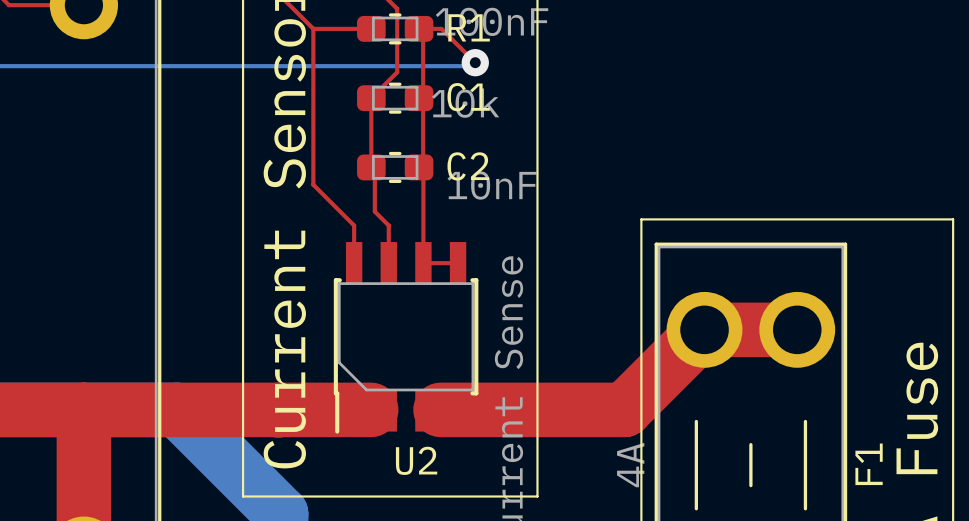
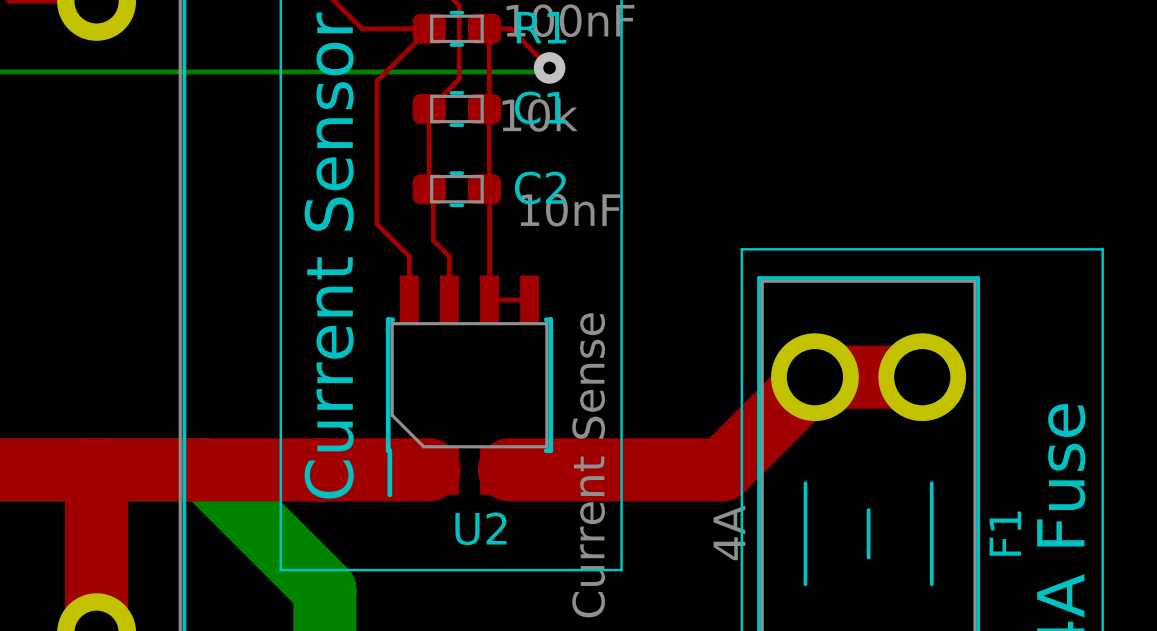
top track: (313, 28) (313, 184) (326, 197) -> (429, 28) (377, 81) (377, 224)

